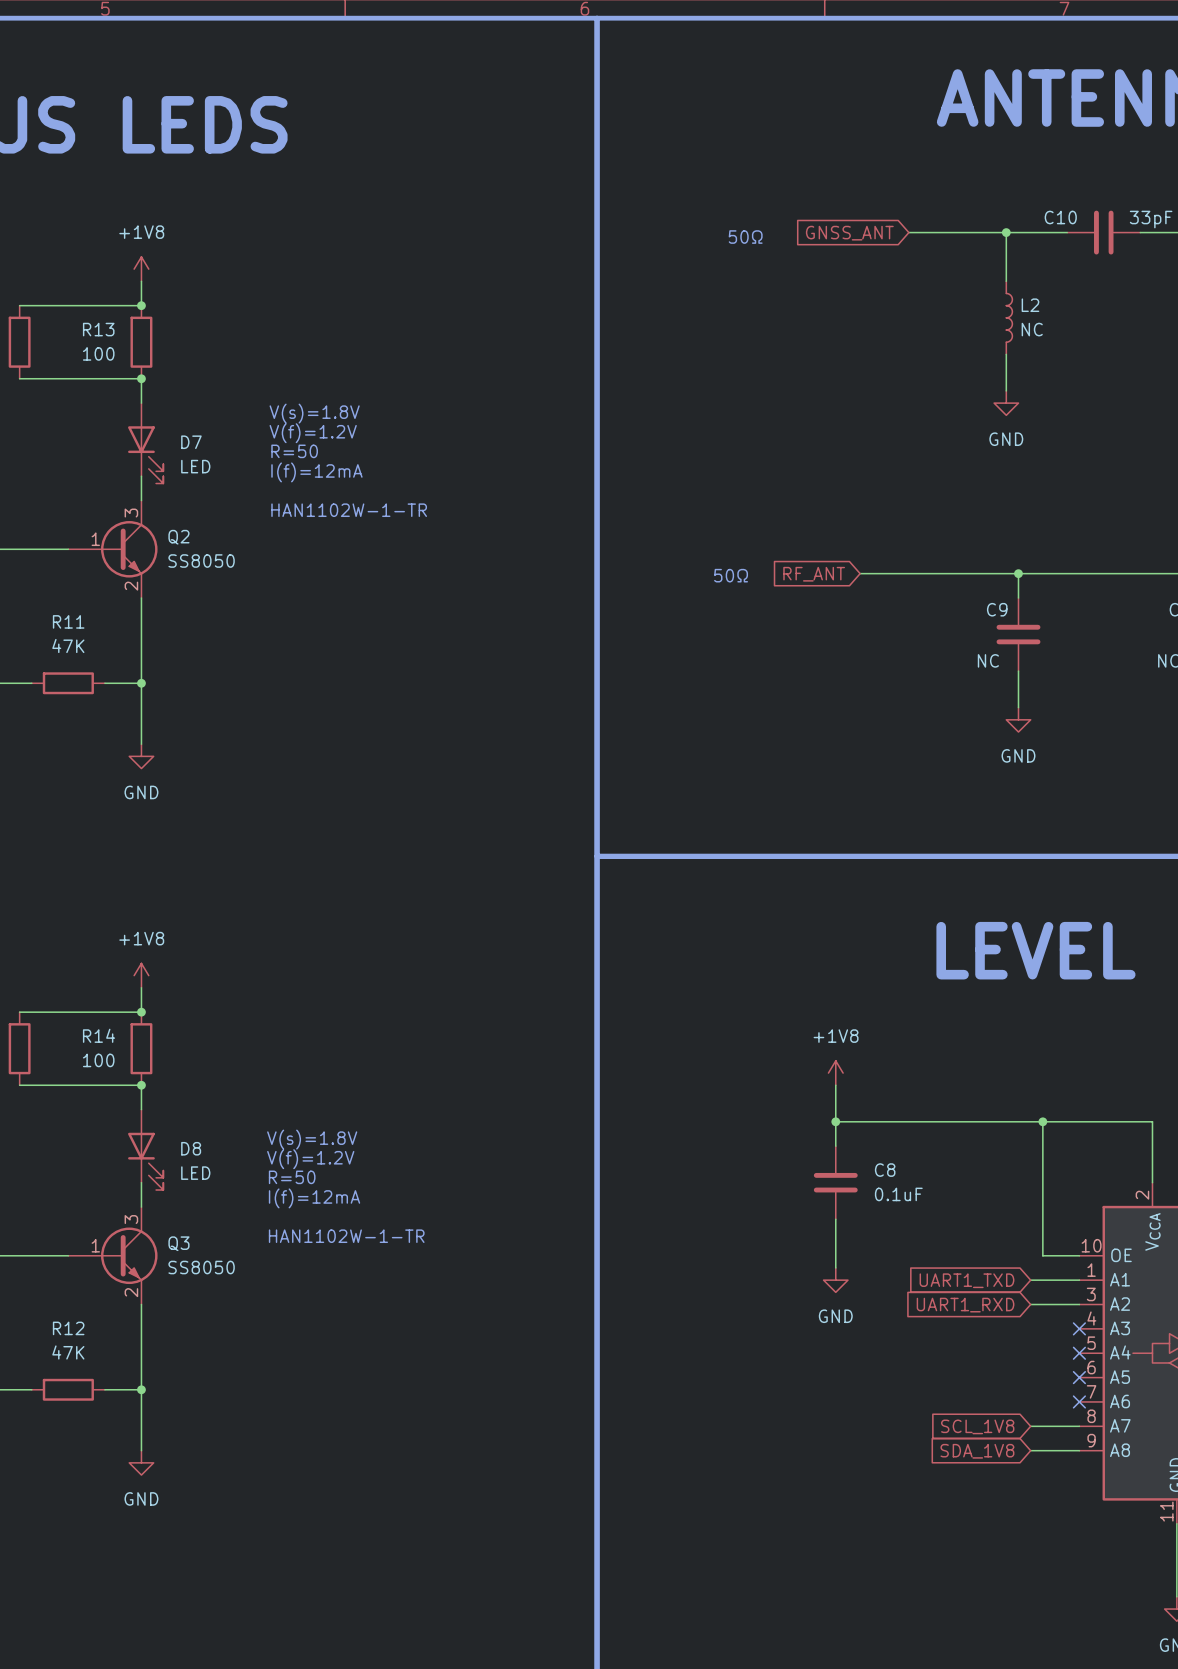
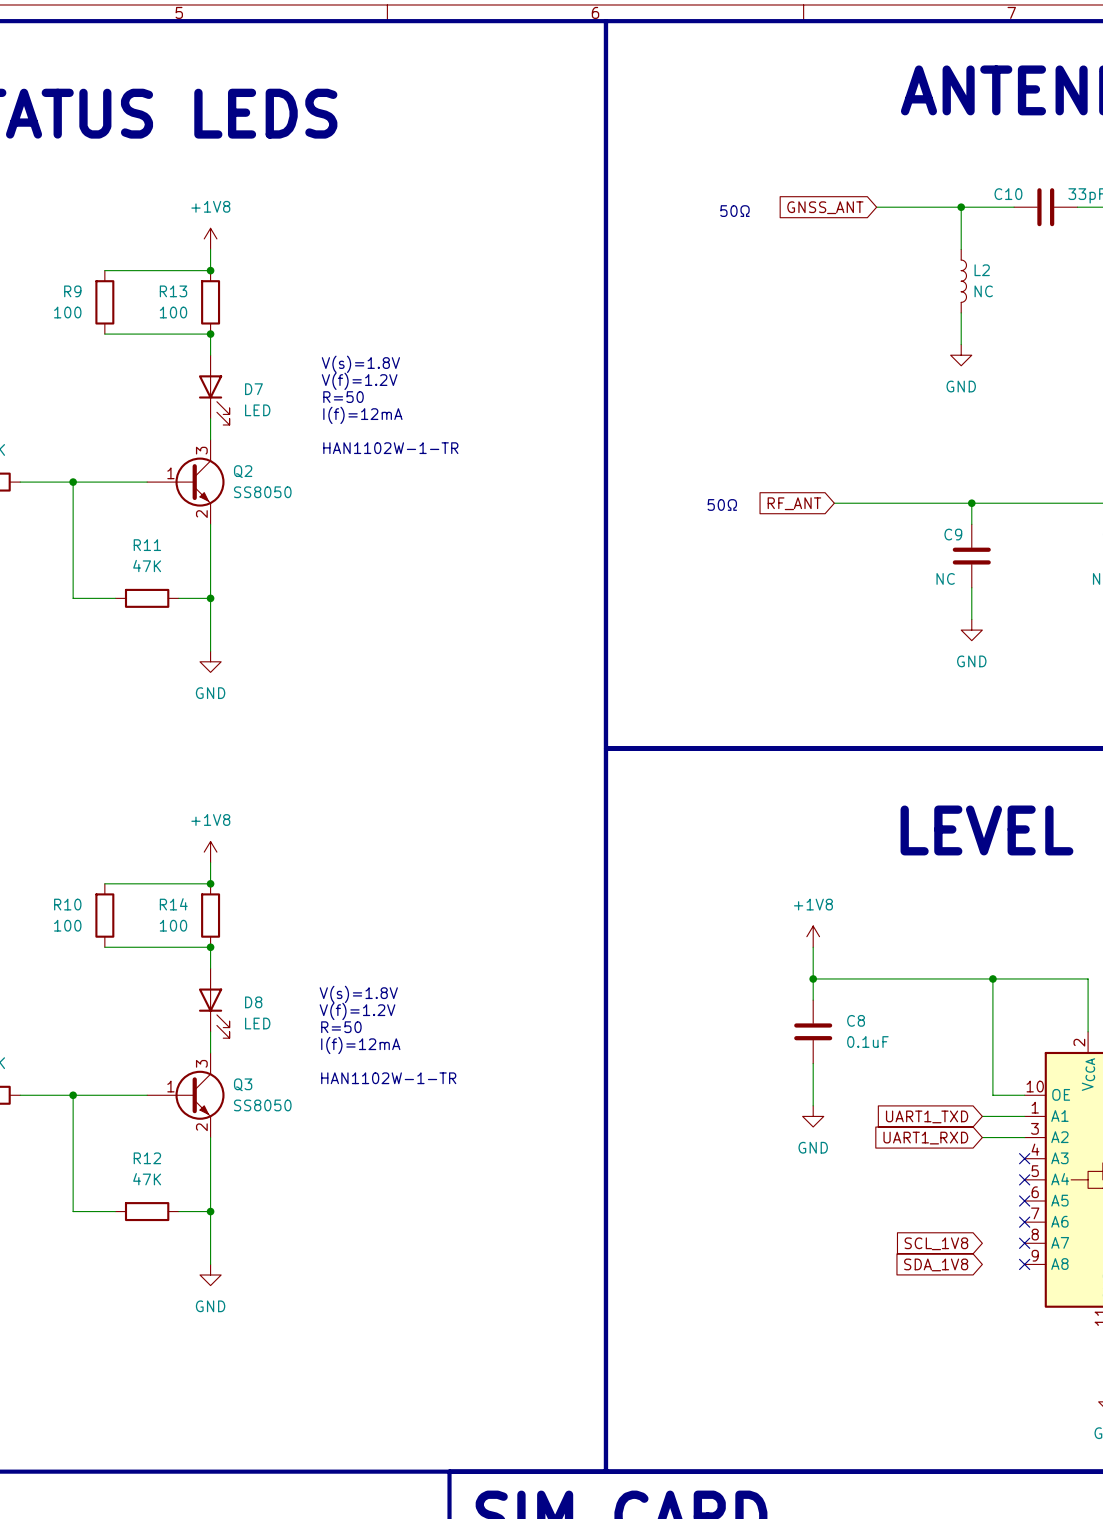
wire: (1030, 1426) (1079, 1426) -> none
no-connect mark: none -> (1024, 1243)
wire: (1030, 1450) (1079, 1450) -> none
no-connect mark: none -> (1024, 1264)

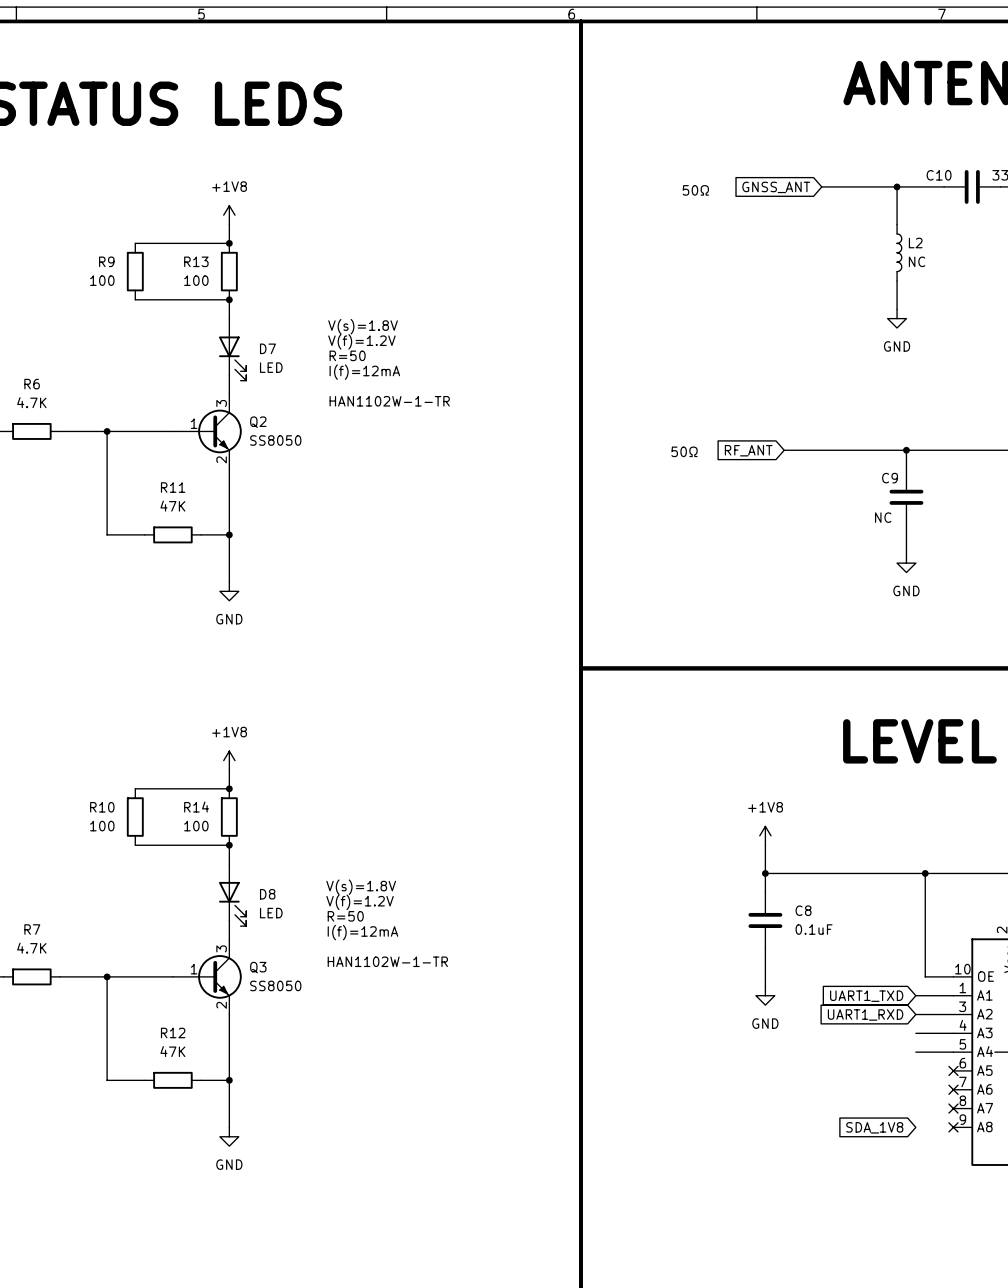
wire: none -> (915, 1033) (953, 1033)
no-connect mark: (1024, 1158) -> none
wire: none -> (915, 1052) (953, 1052)
no-connect mark: (1024, 1179) -> none
global label: SCL_1V8 (936, 1243) -> none

